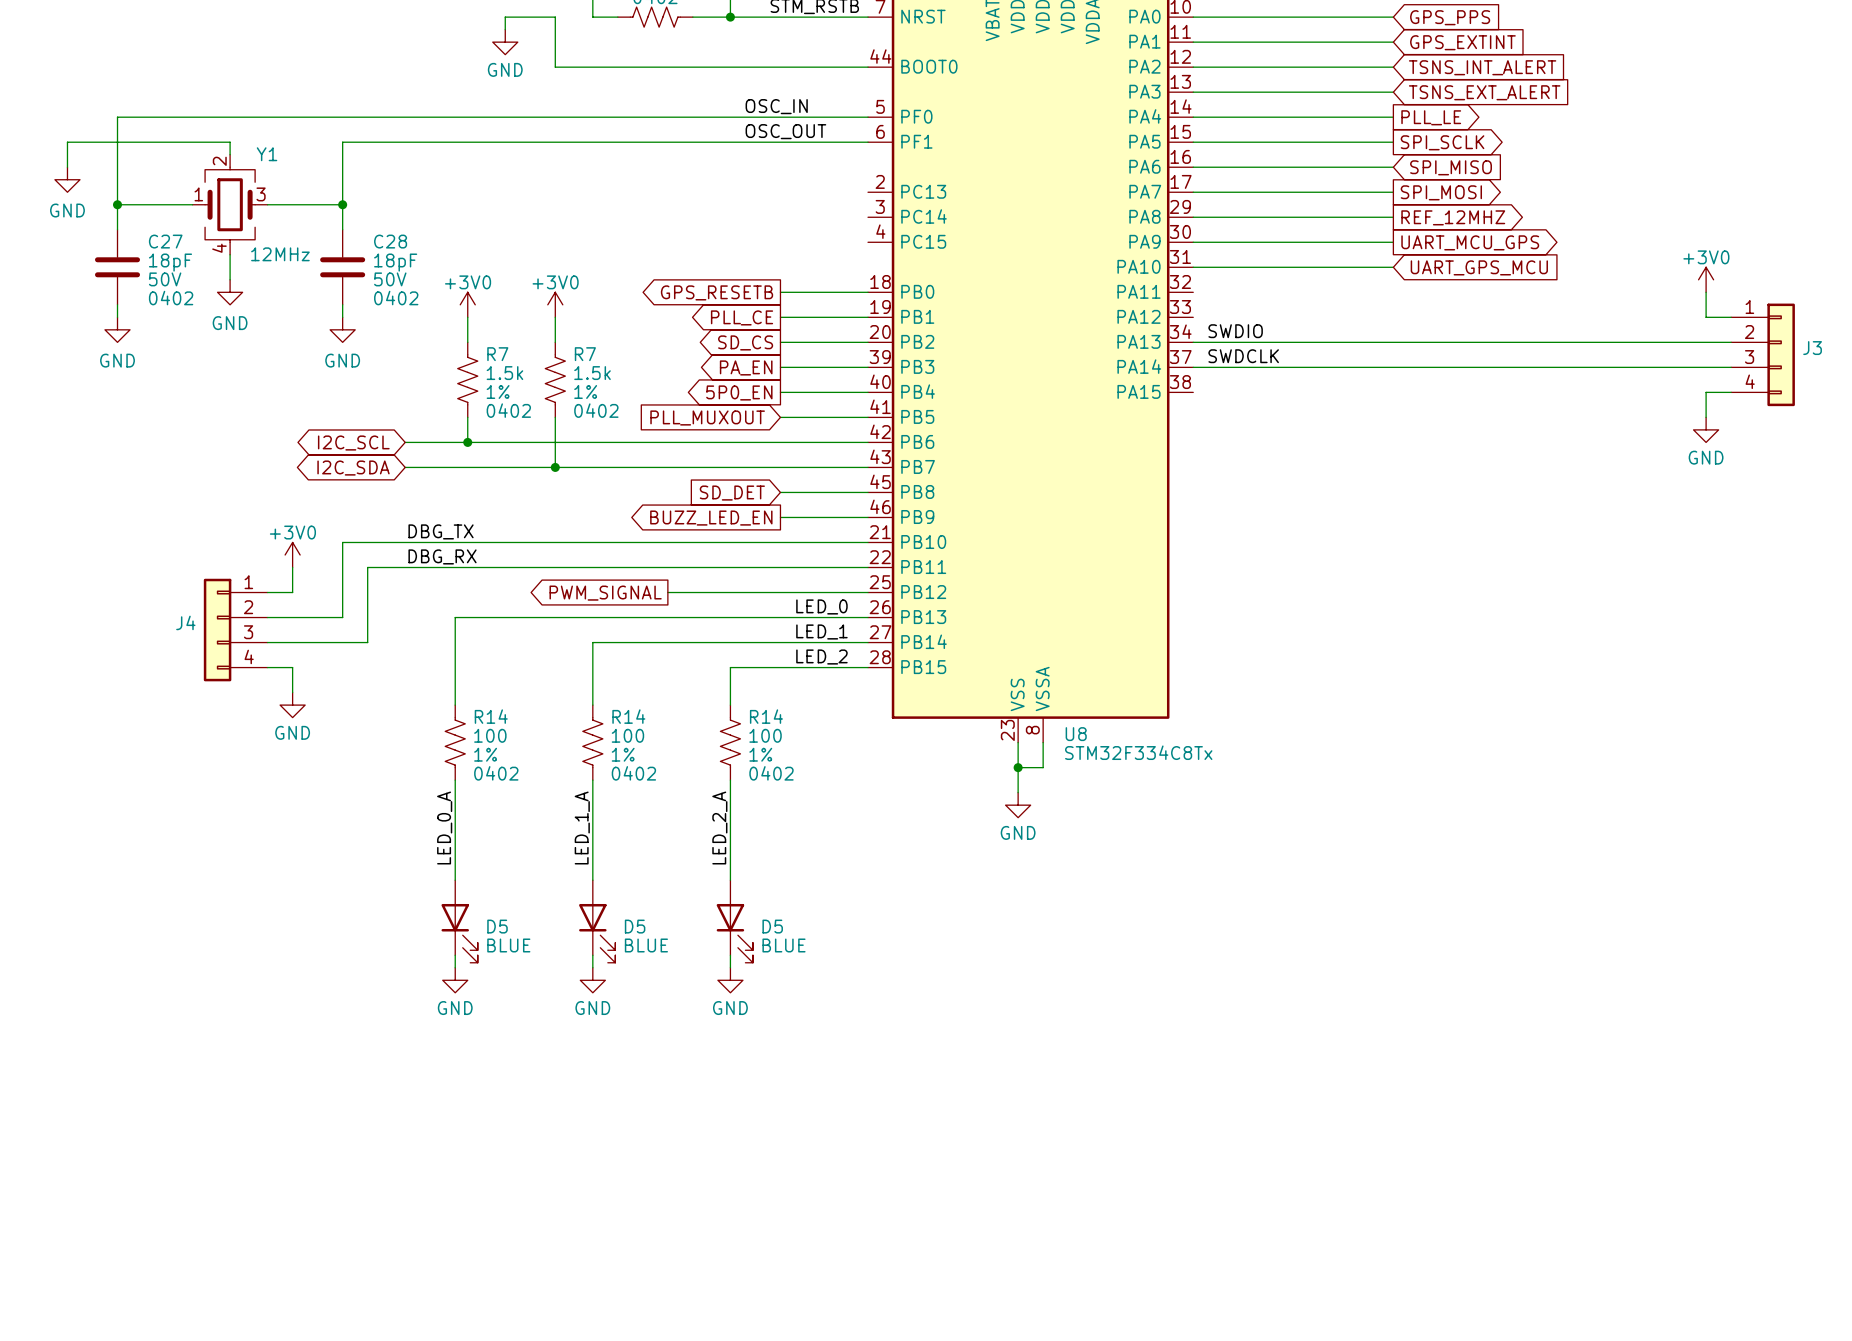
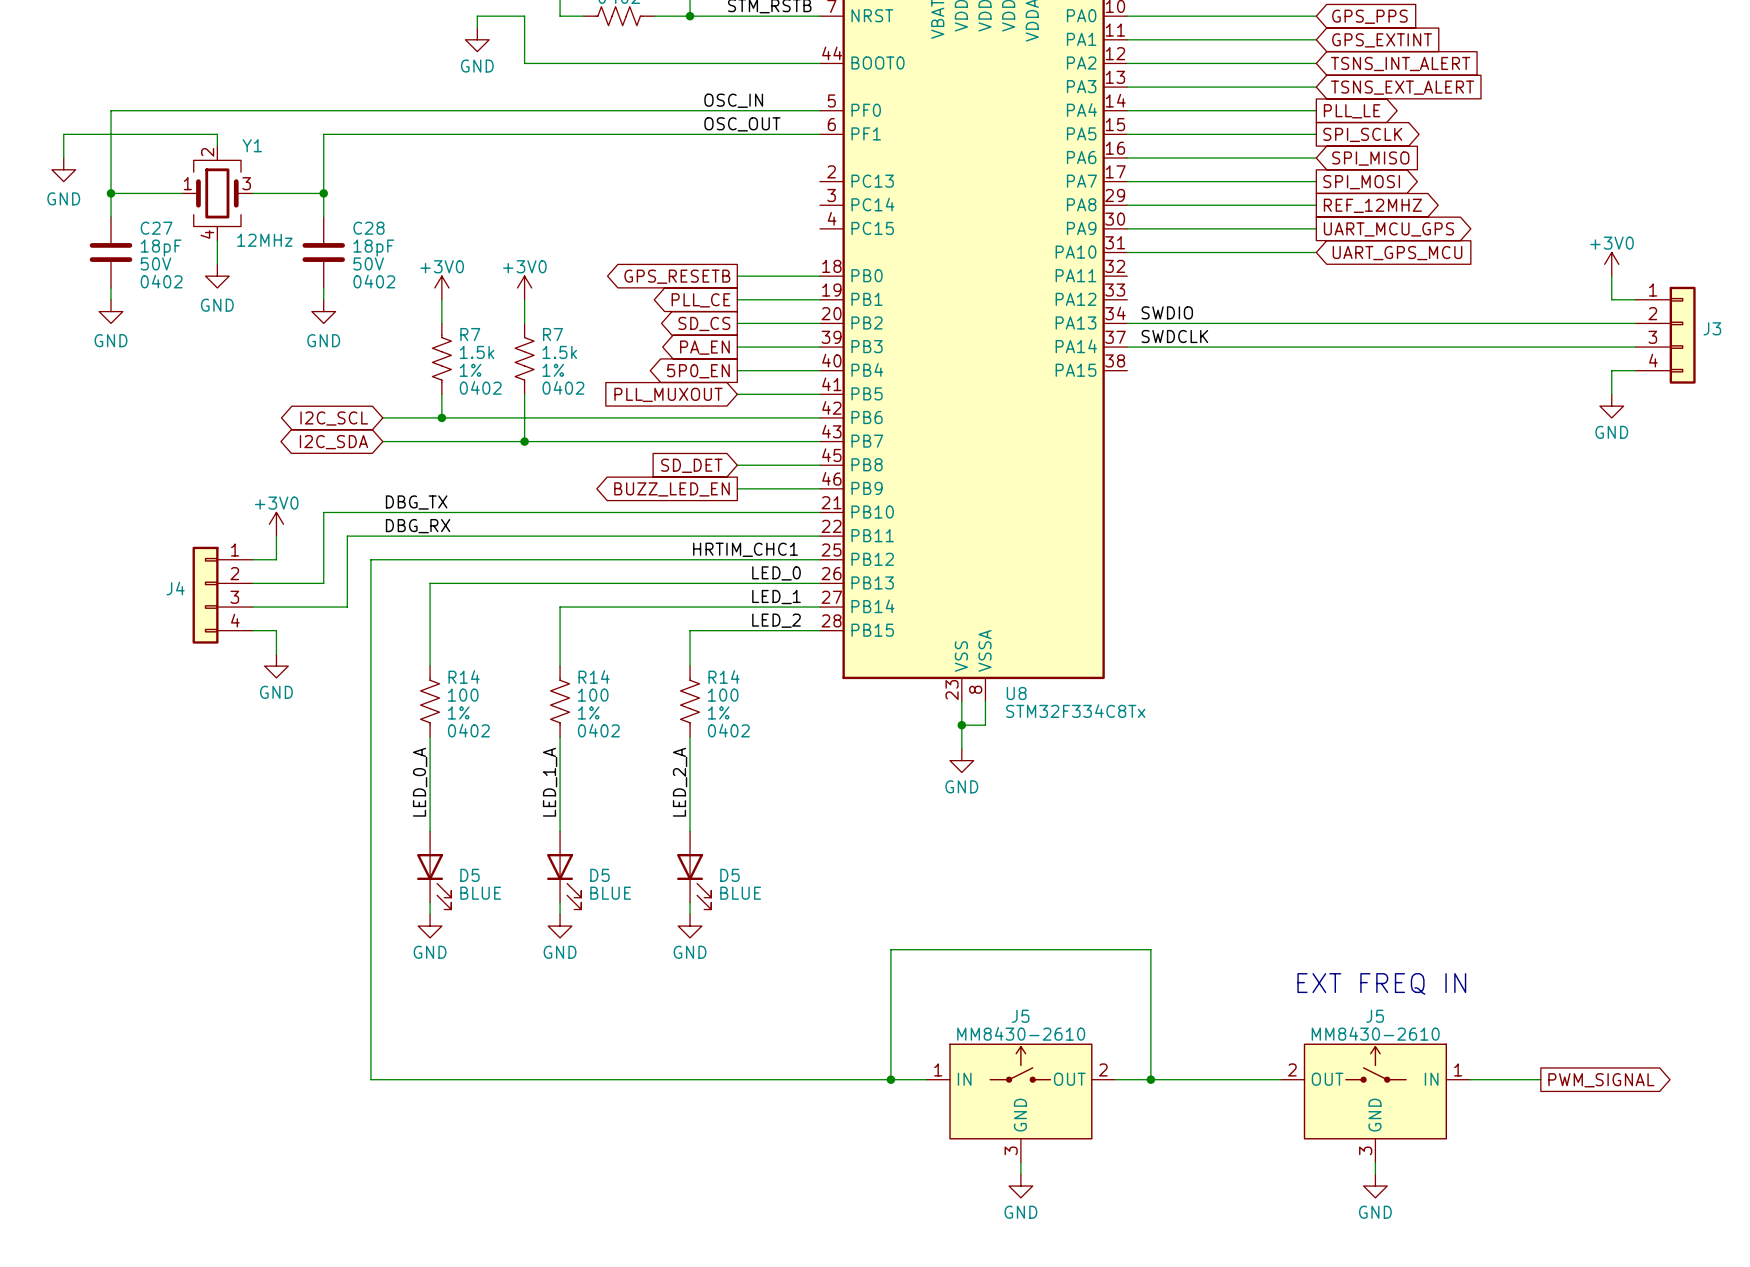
label: none -> HRTIM_CHC1 (745, 549)
wire: none -> (630, 559) (370, 559) (370, 1079) (926, 1079)
global label: PWM_SIGNAL (605, 593) -> none
text: none -> EXT FREQ IN (1381, 983)
wire: none -> (890, 1079) (890, 949) (1150, 949) (1150, 1079)
junction: none -> (890, 1079)
wire: none -> (1115, 1079) (1280, 1079)
junction: none -> (1150, 1079)
wire: none -> (1469, 1079) (1540, 1079)
global label: none -> PWM_SIGNAL (1601, 1080)
J5: none -> MM8430-2610 (1020, 1102)
J5: none -> MM8430-2610 (1375, 1102)
wire: none -> (1020, 1162) (1020, 1174)
wire: none -> (1375, 1162) (1375, 1174)
power symbol: none -> GND (1020, 1186)
power symbol: none -> GND (1375, 1186)

